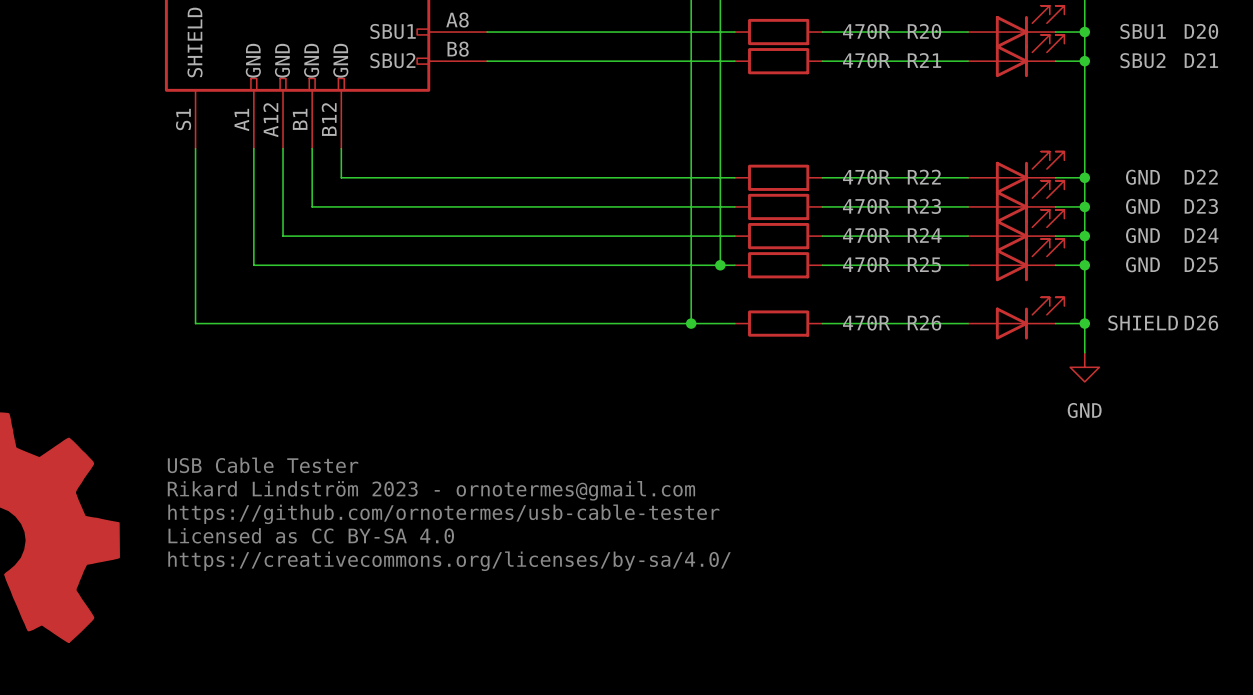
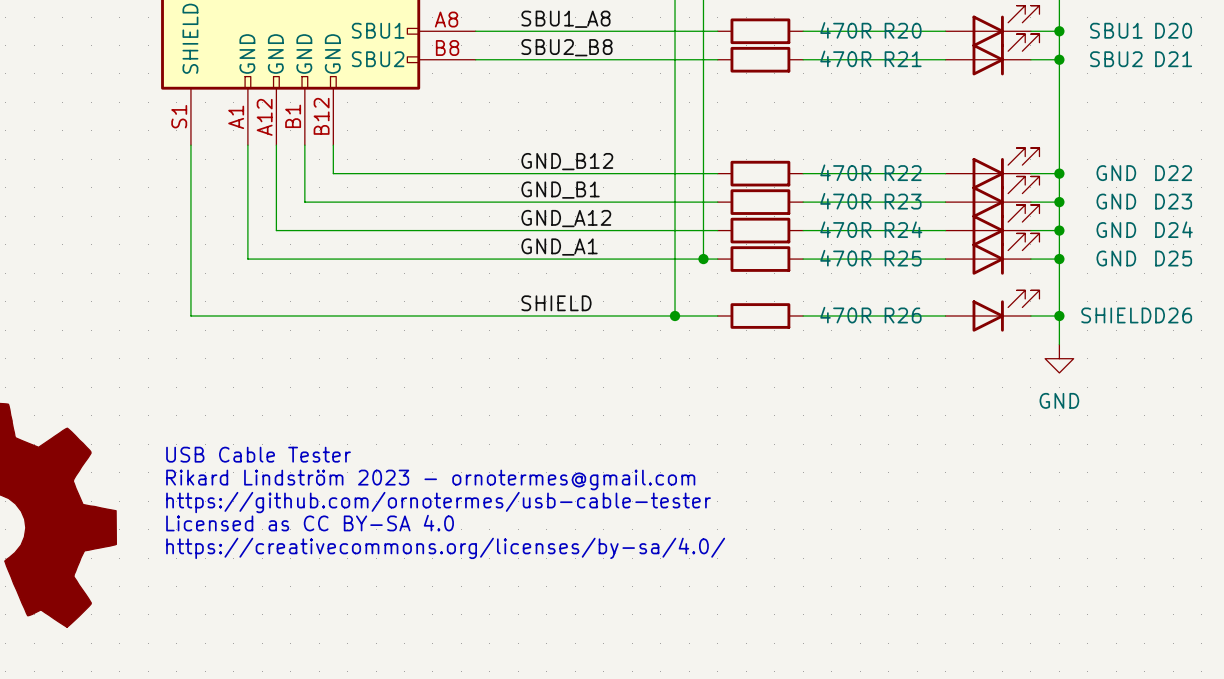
label: none -> SBU1_A8 (565, 19)
label: none -> SBU2_B8 (566, 47)
label: none -> GND_B12 (567, 161)
label: none -> GND_B1 (560, 190)
label: none -> GND_A12 (566, 218)
label: none -> GND_A1 (559, 247)
label: none -> SHIELD (556, 303)

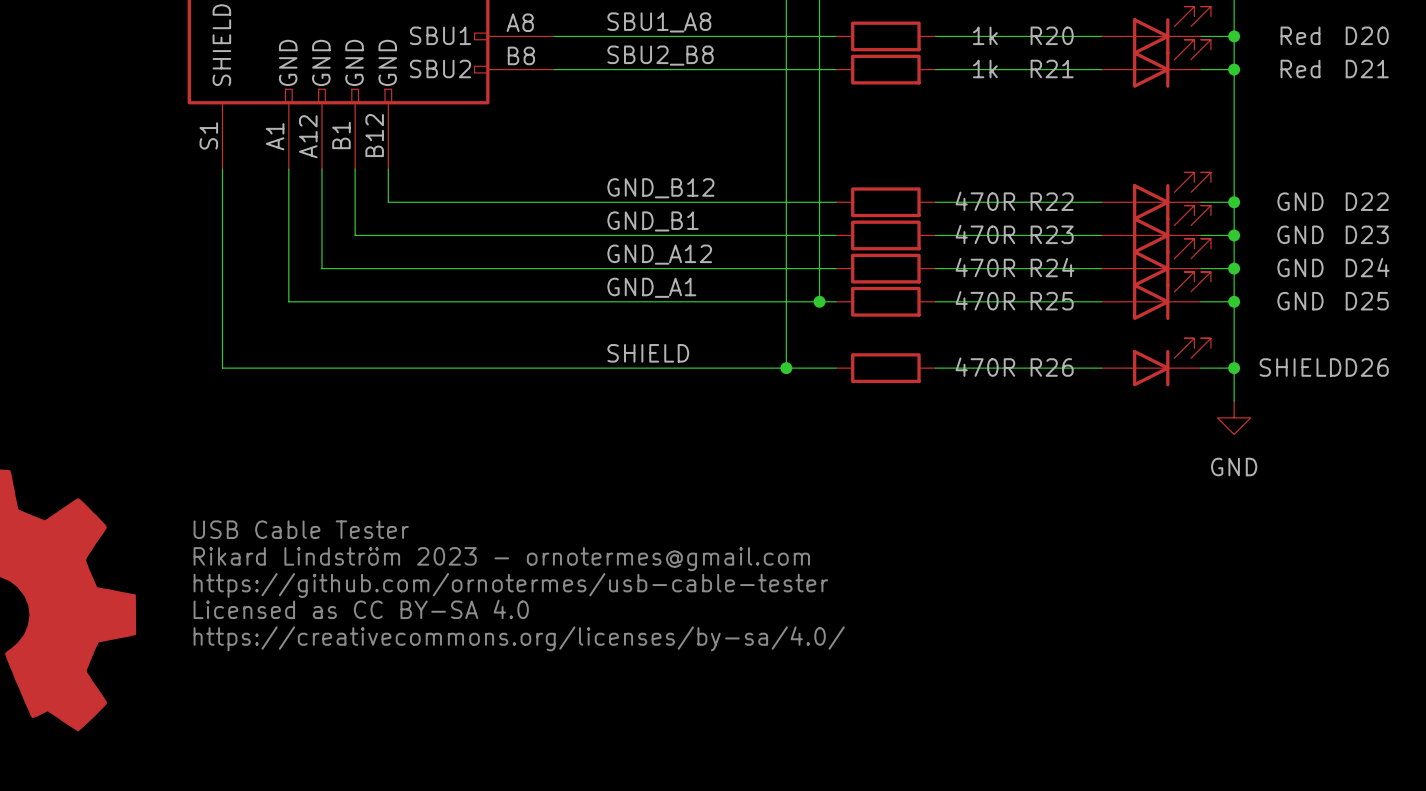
R20 value: 470R (845, 30) -> 1k (985, 35)
D20 value: SBU1 (1116, 30) -> Red (1300, 35)
R21 value: 470R (845, 58) -> 1k (985, 68)
D21 value: SBU2 (1116, 59) -> Red (1300, 68)

